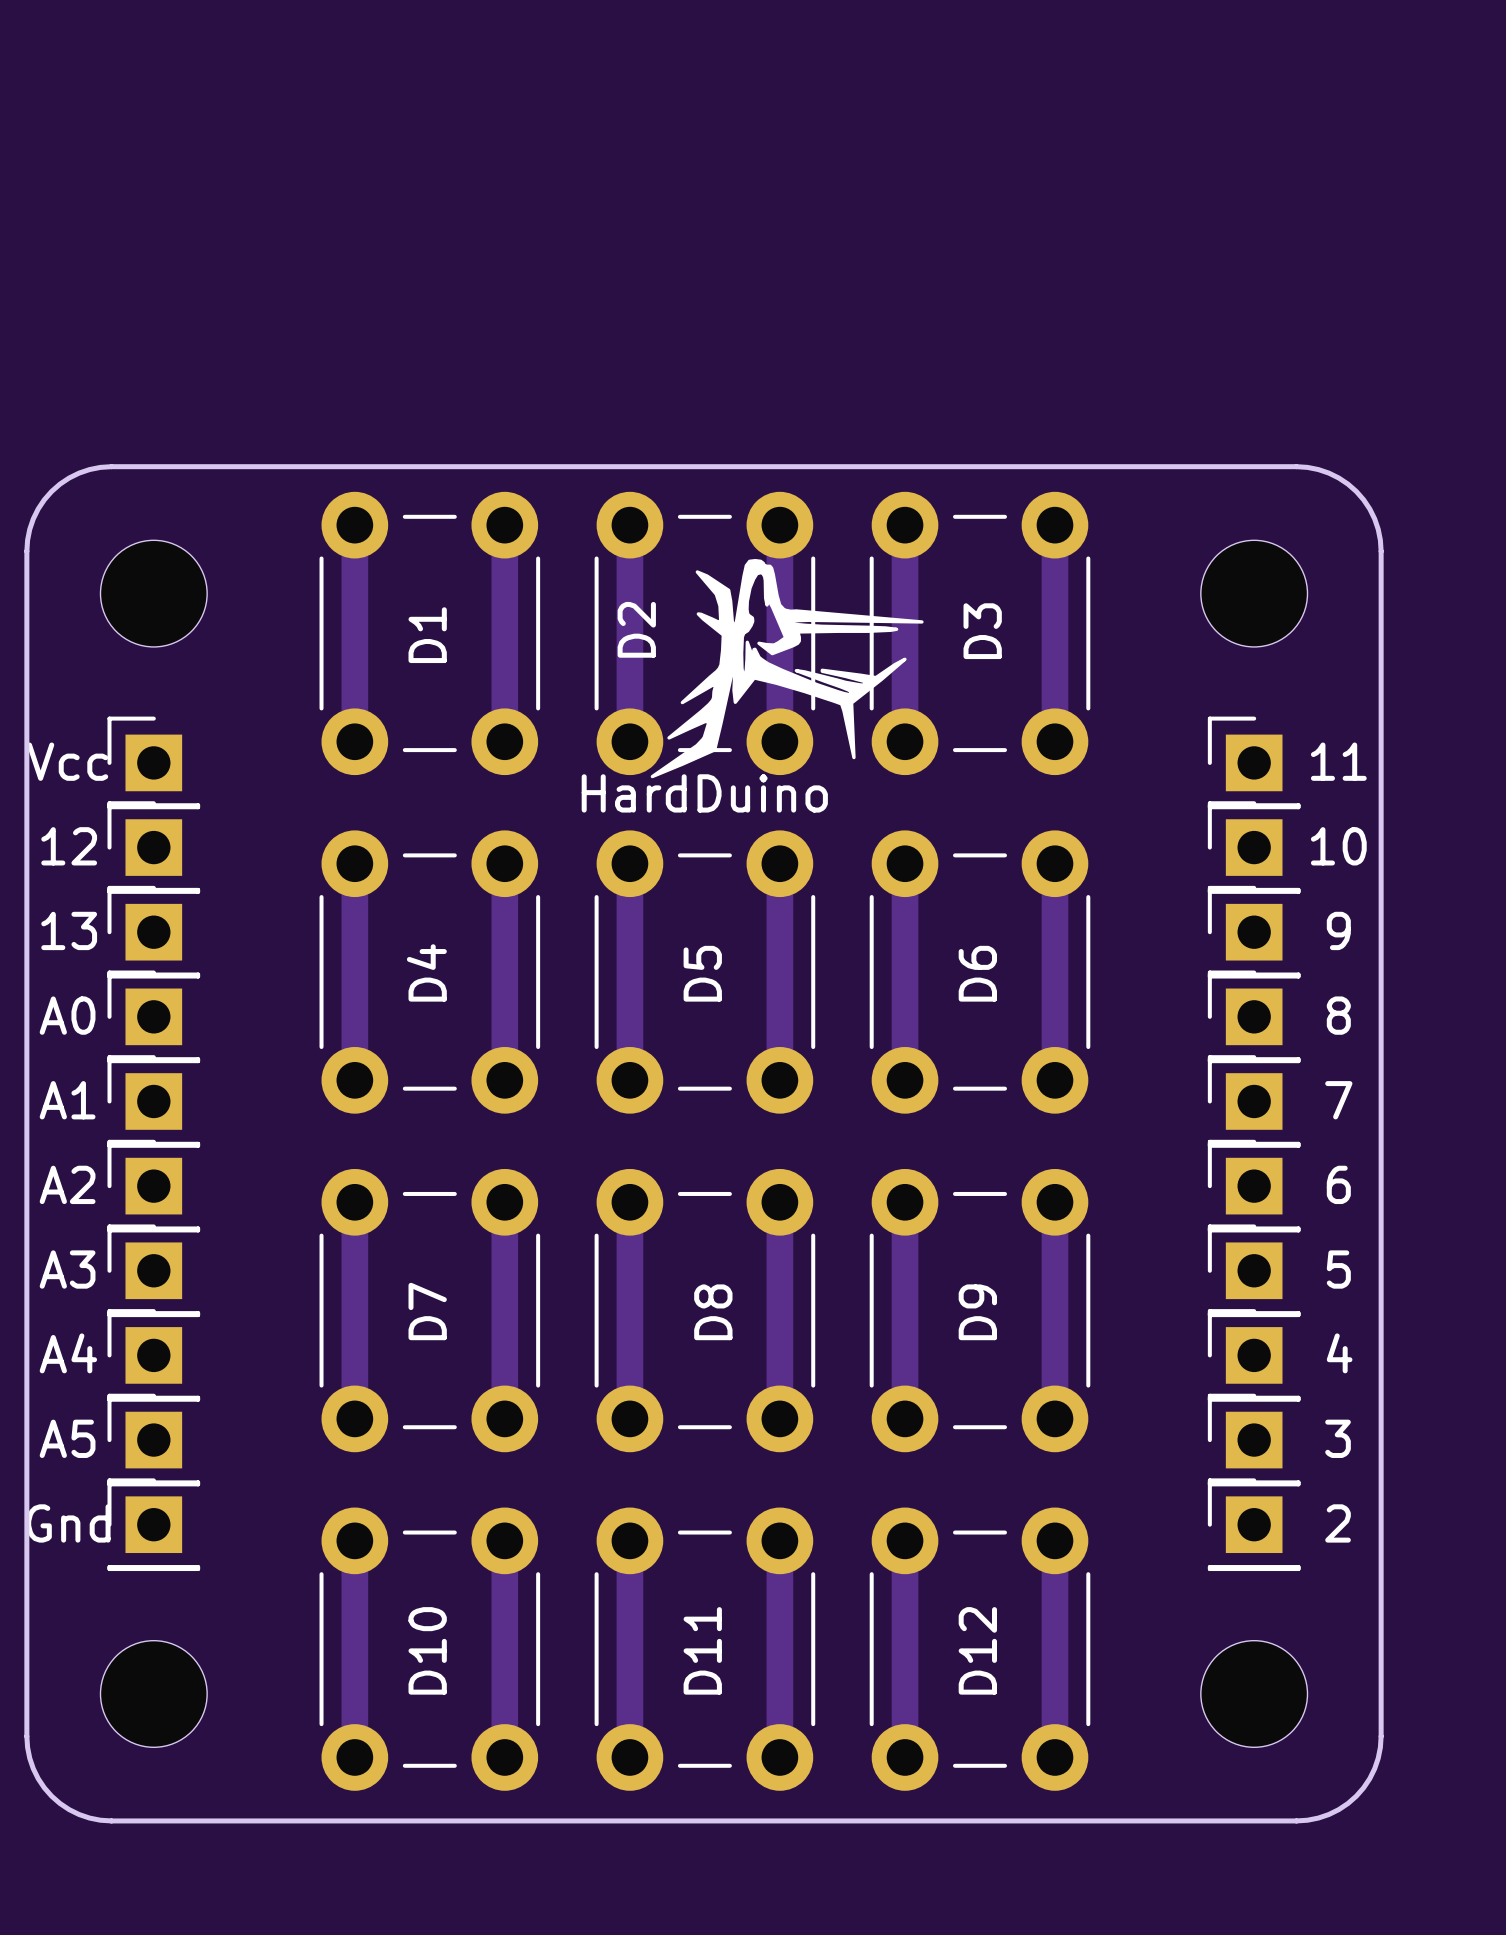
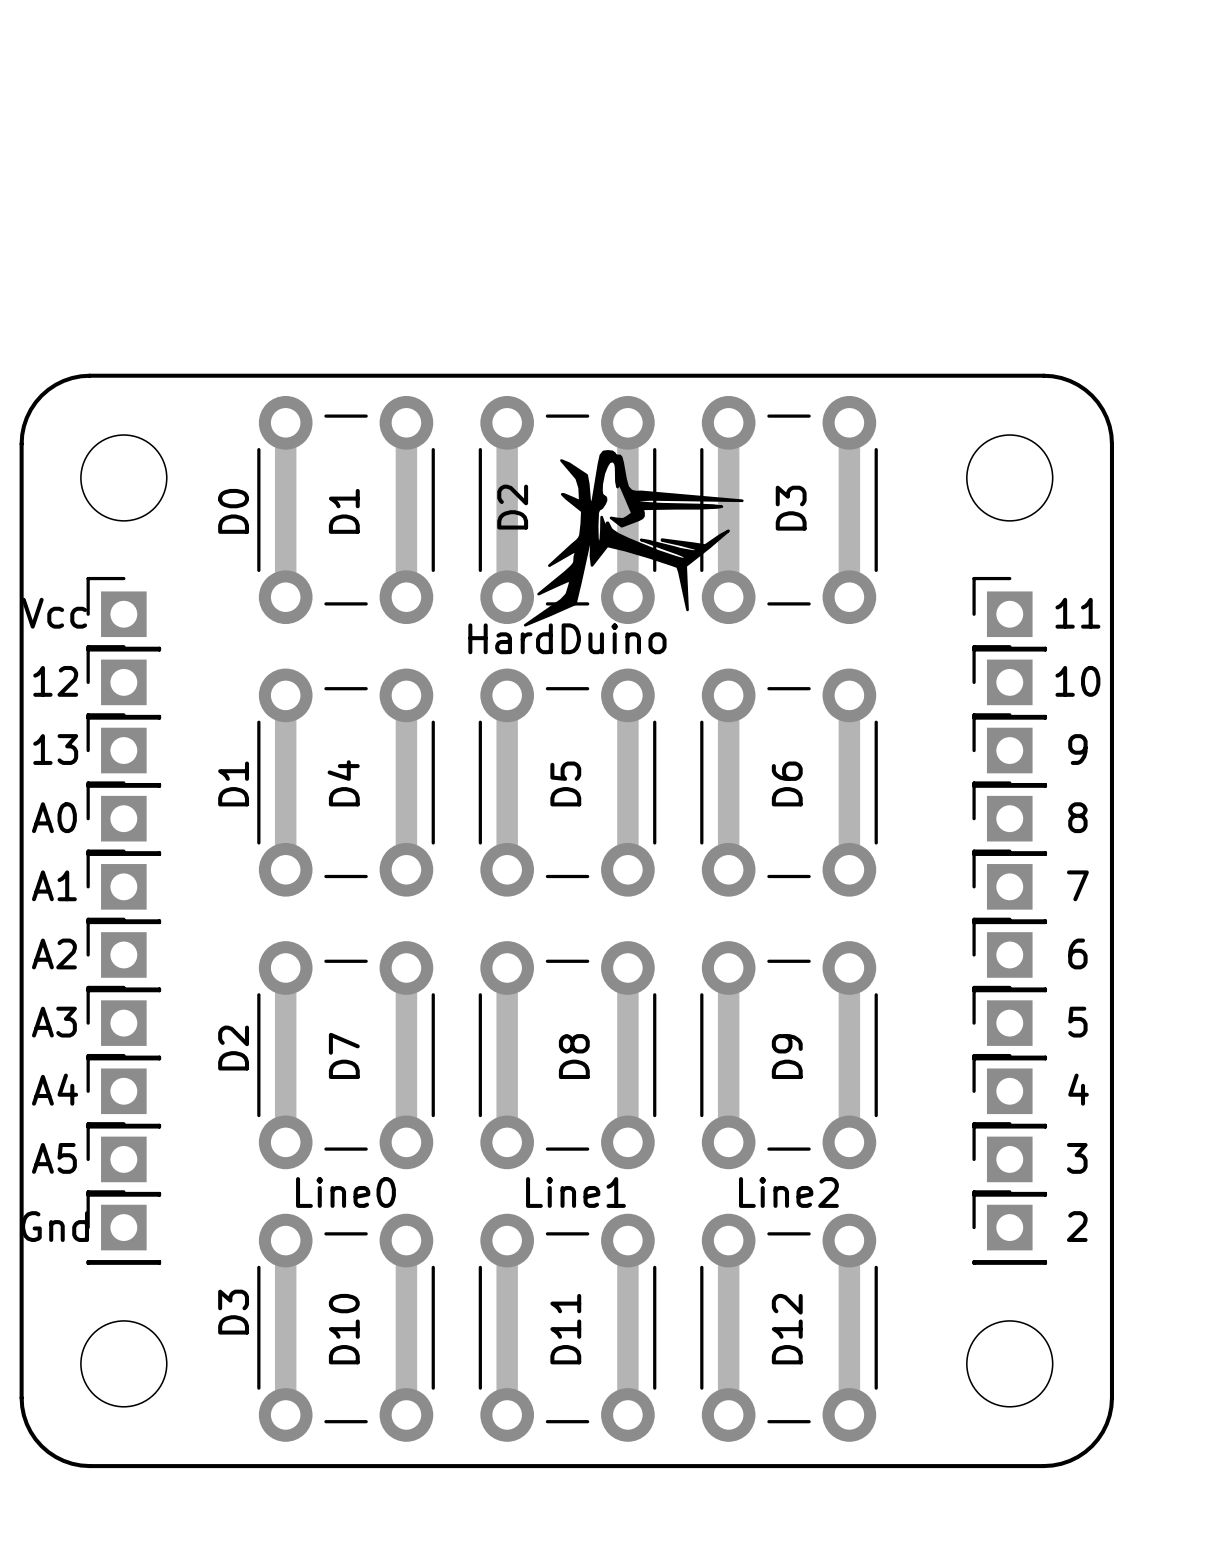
text: none -> D0 (233, 511)
text: none -> D1 (233, 783)
text: none -> D2 (233, 1048)
text: none -> Line0 (345, 1192)
text: none -> Line1 (575, 1192)
text: none -> Line2 (788, 1192)
text: none -> D3 (233, 1312)

